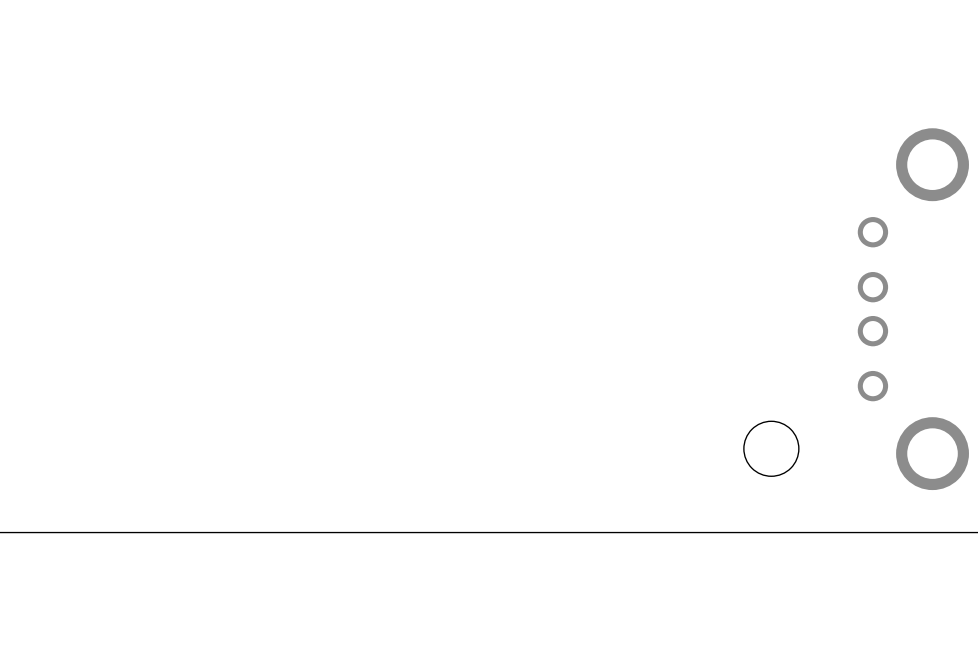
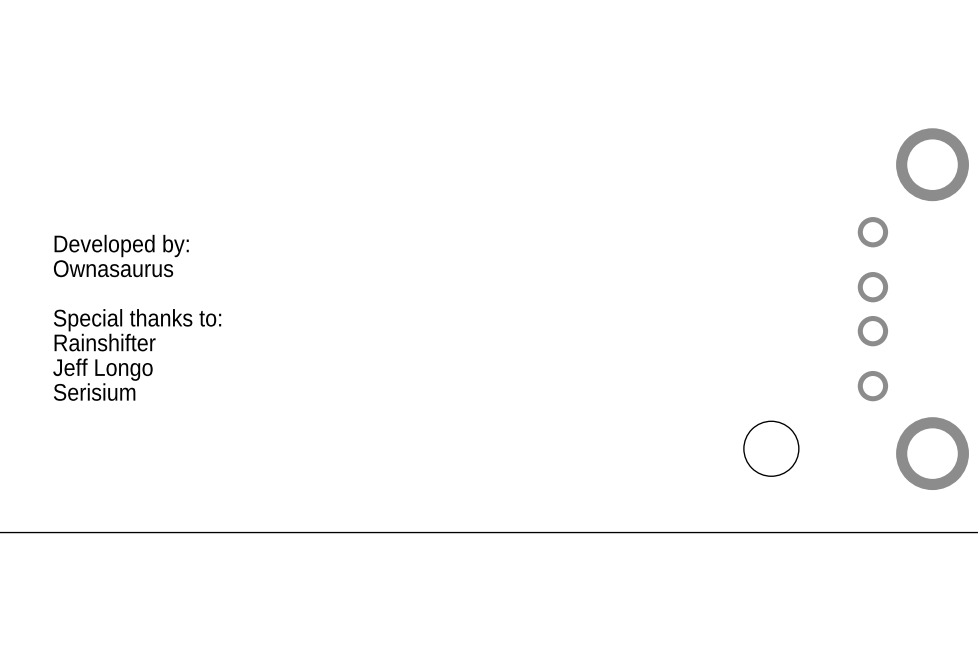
text: none -> Developed by: (121, 246)
text: none -> Ownasaurus (113, 268)
text: none -> Special thanks to: (137, 320)
text: none -> Rainshifter (105, 342)
text: none -> Jeff Longo (102, 369)
text: none -> Serisium (94, 392)

